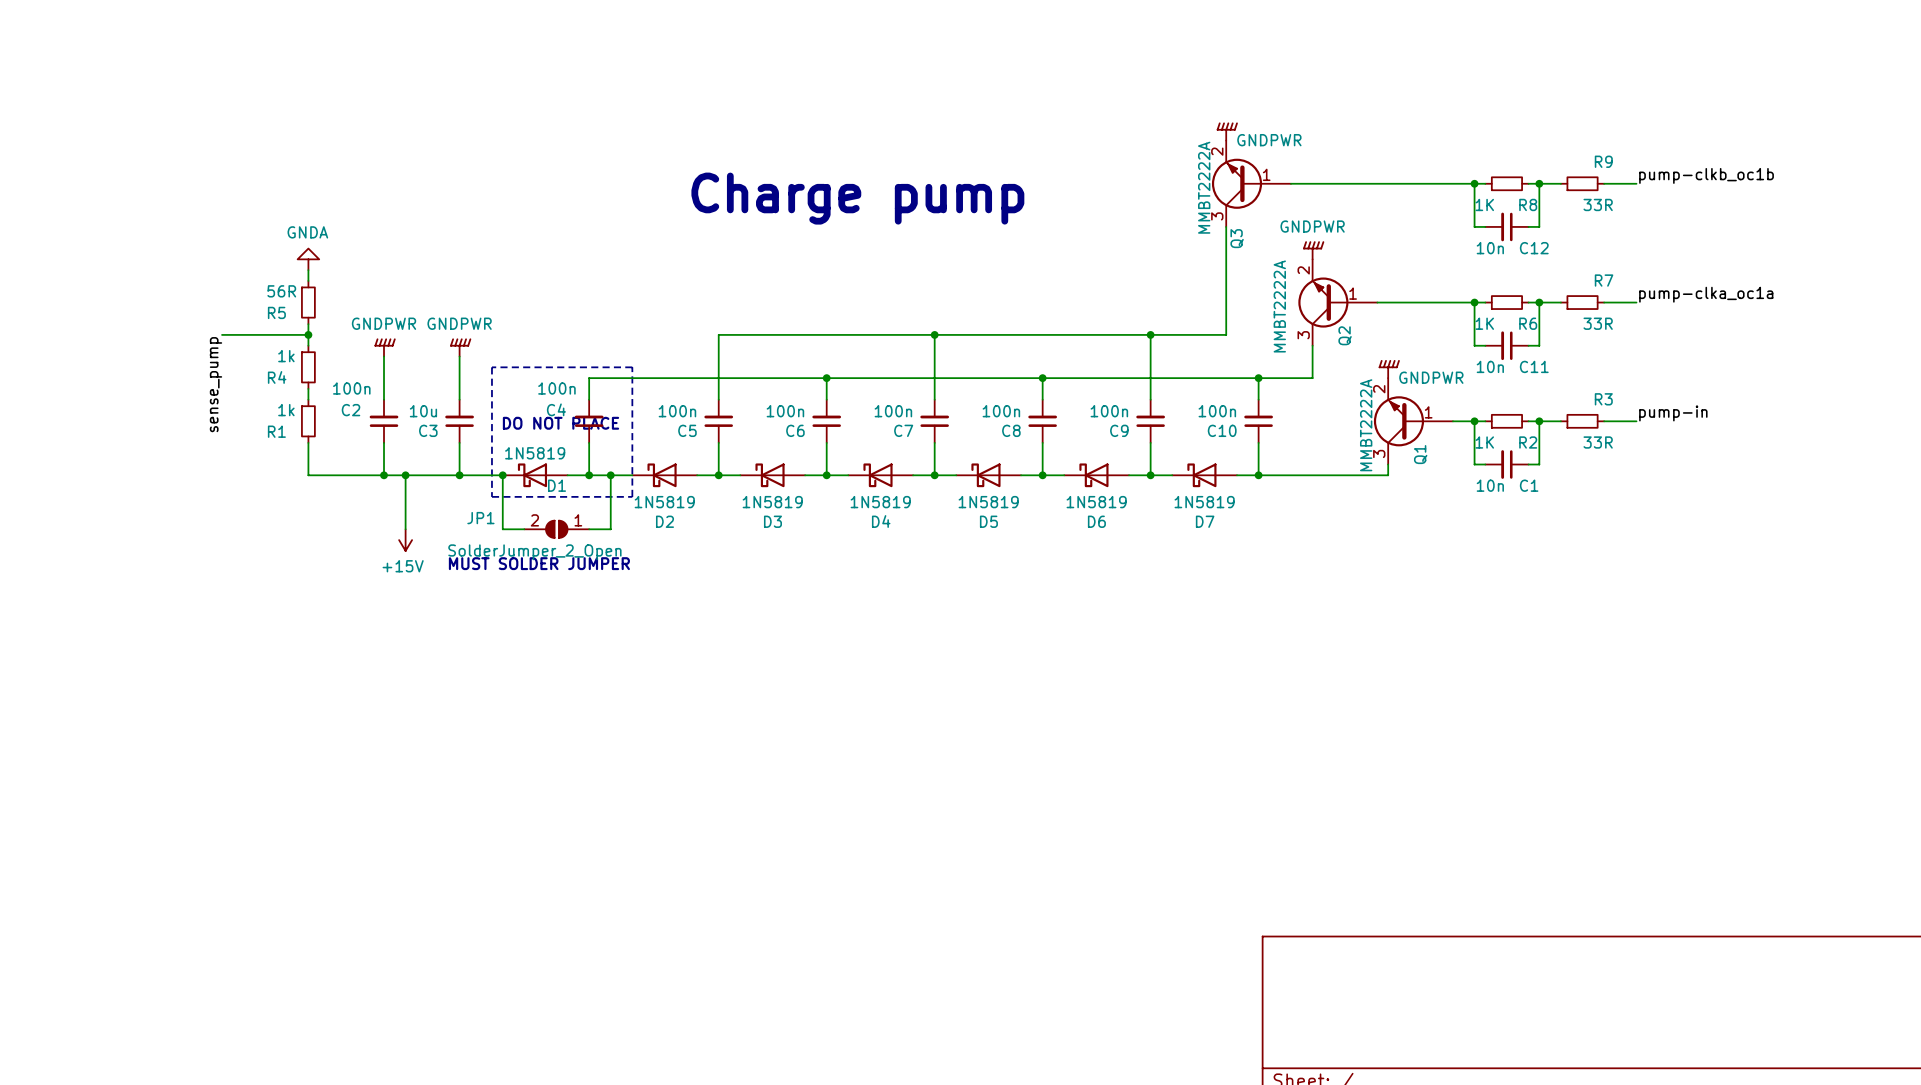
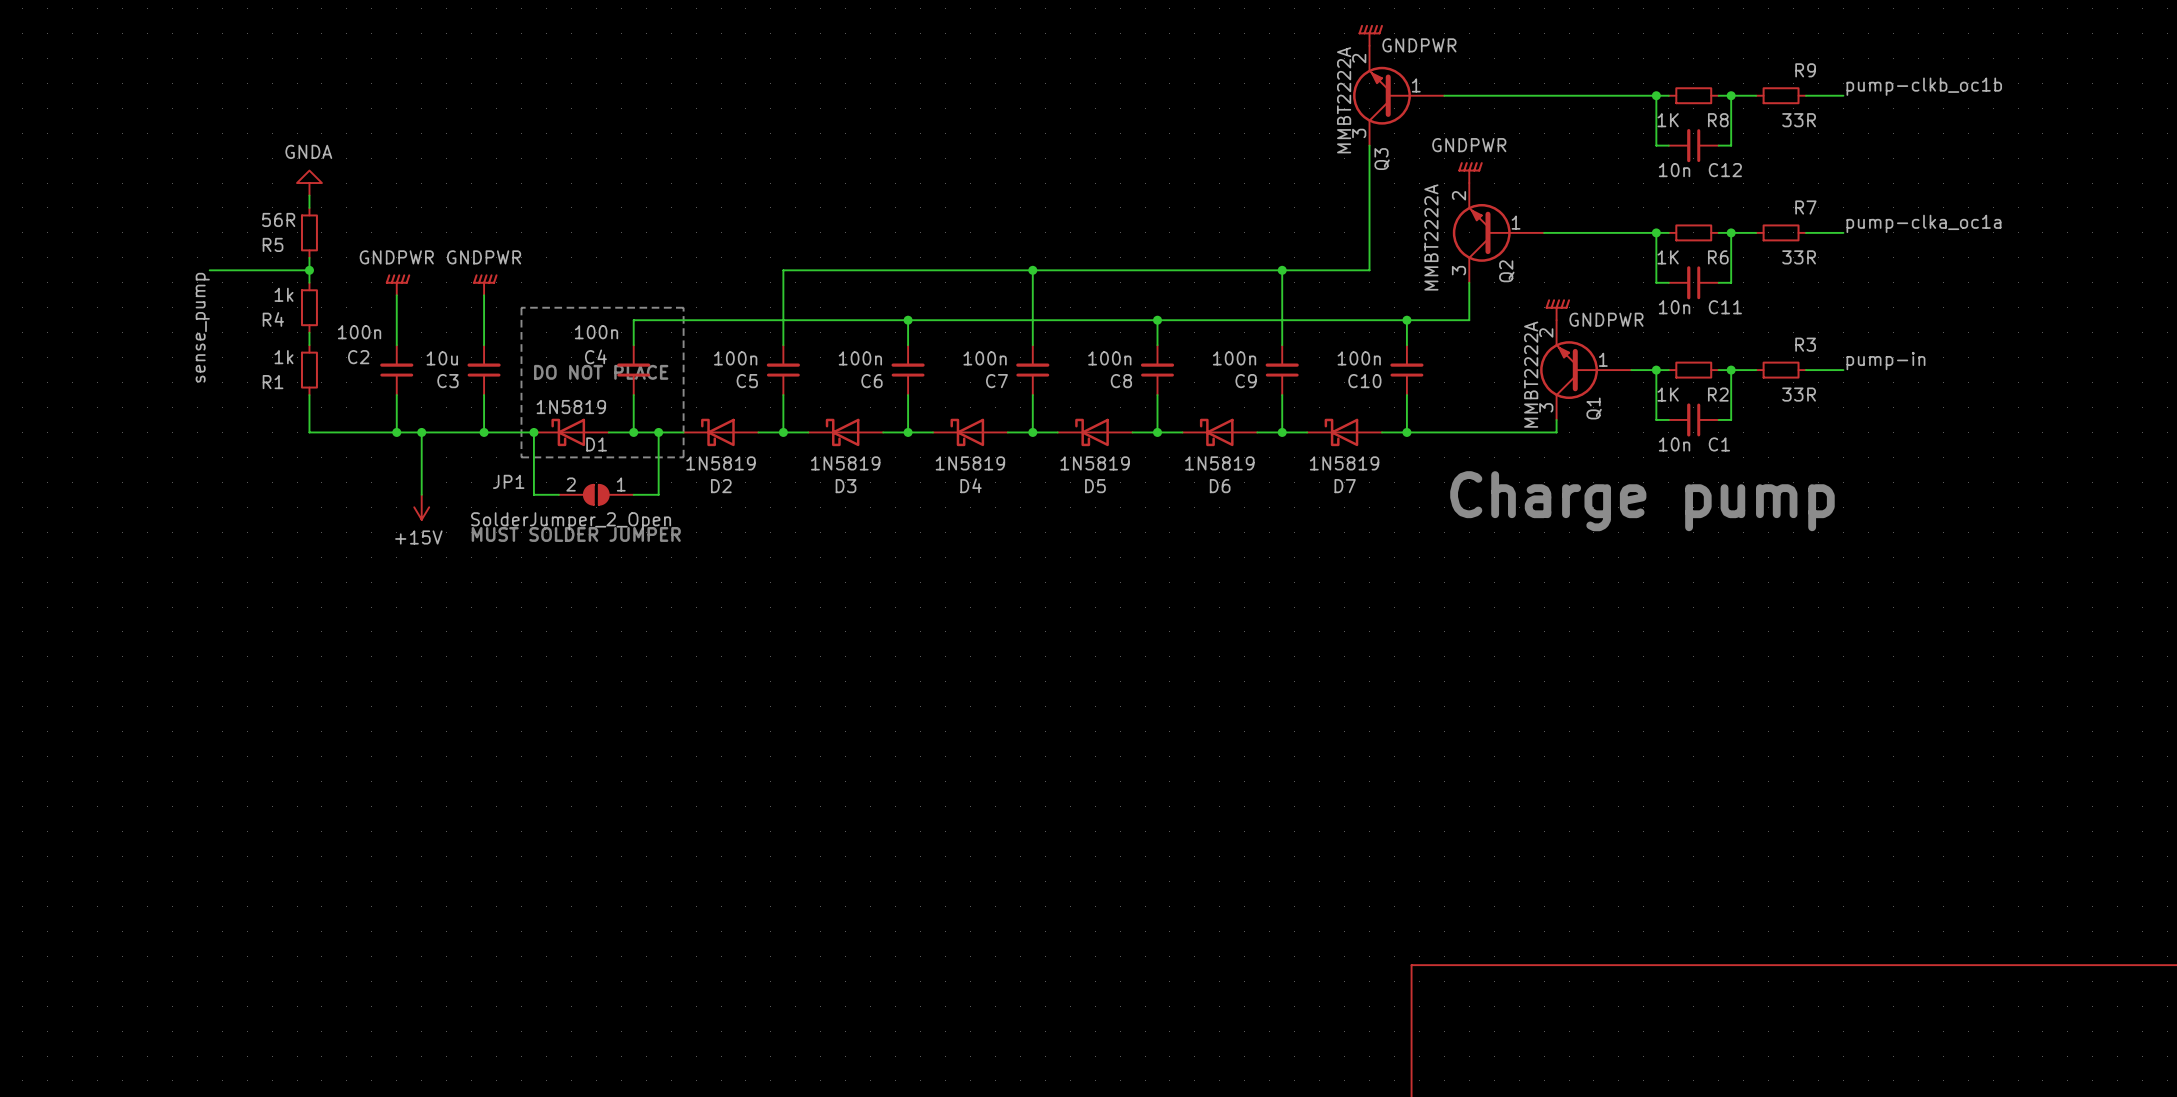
text: Charge pump (857, 198) -> none
text: none -> Charge pump (1642, 501)

